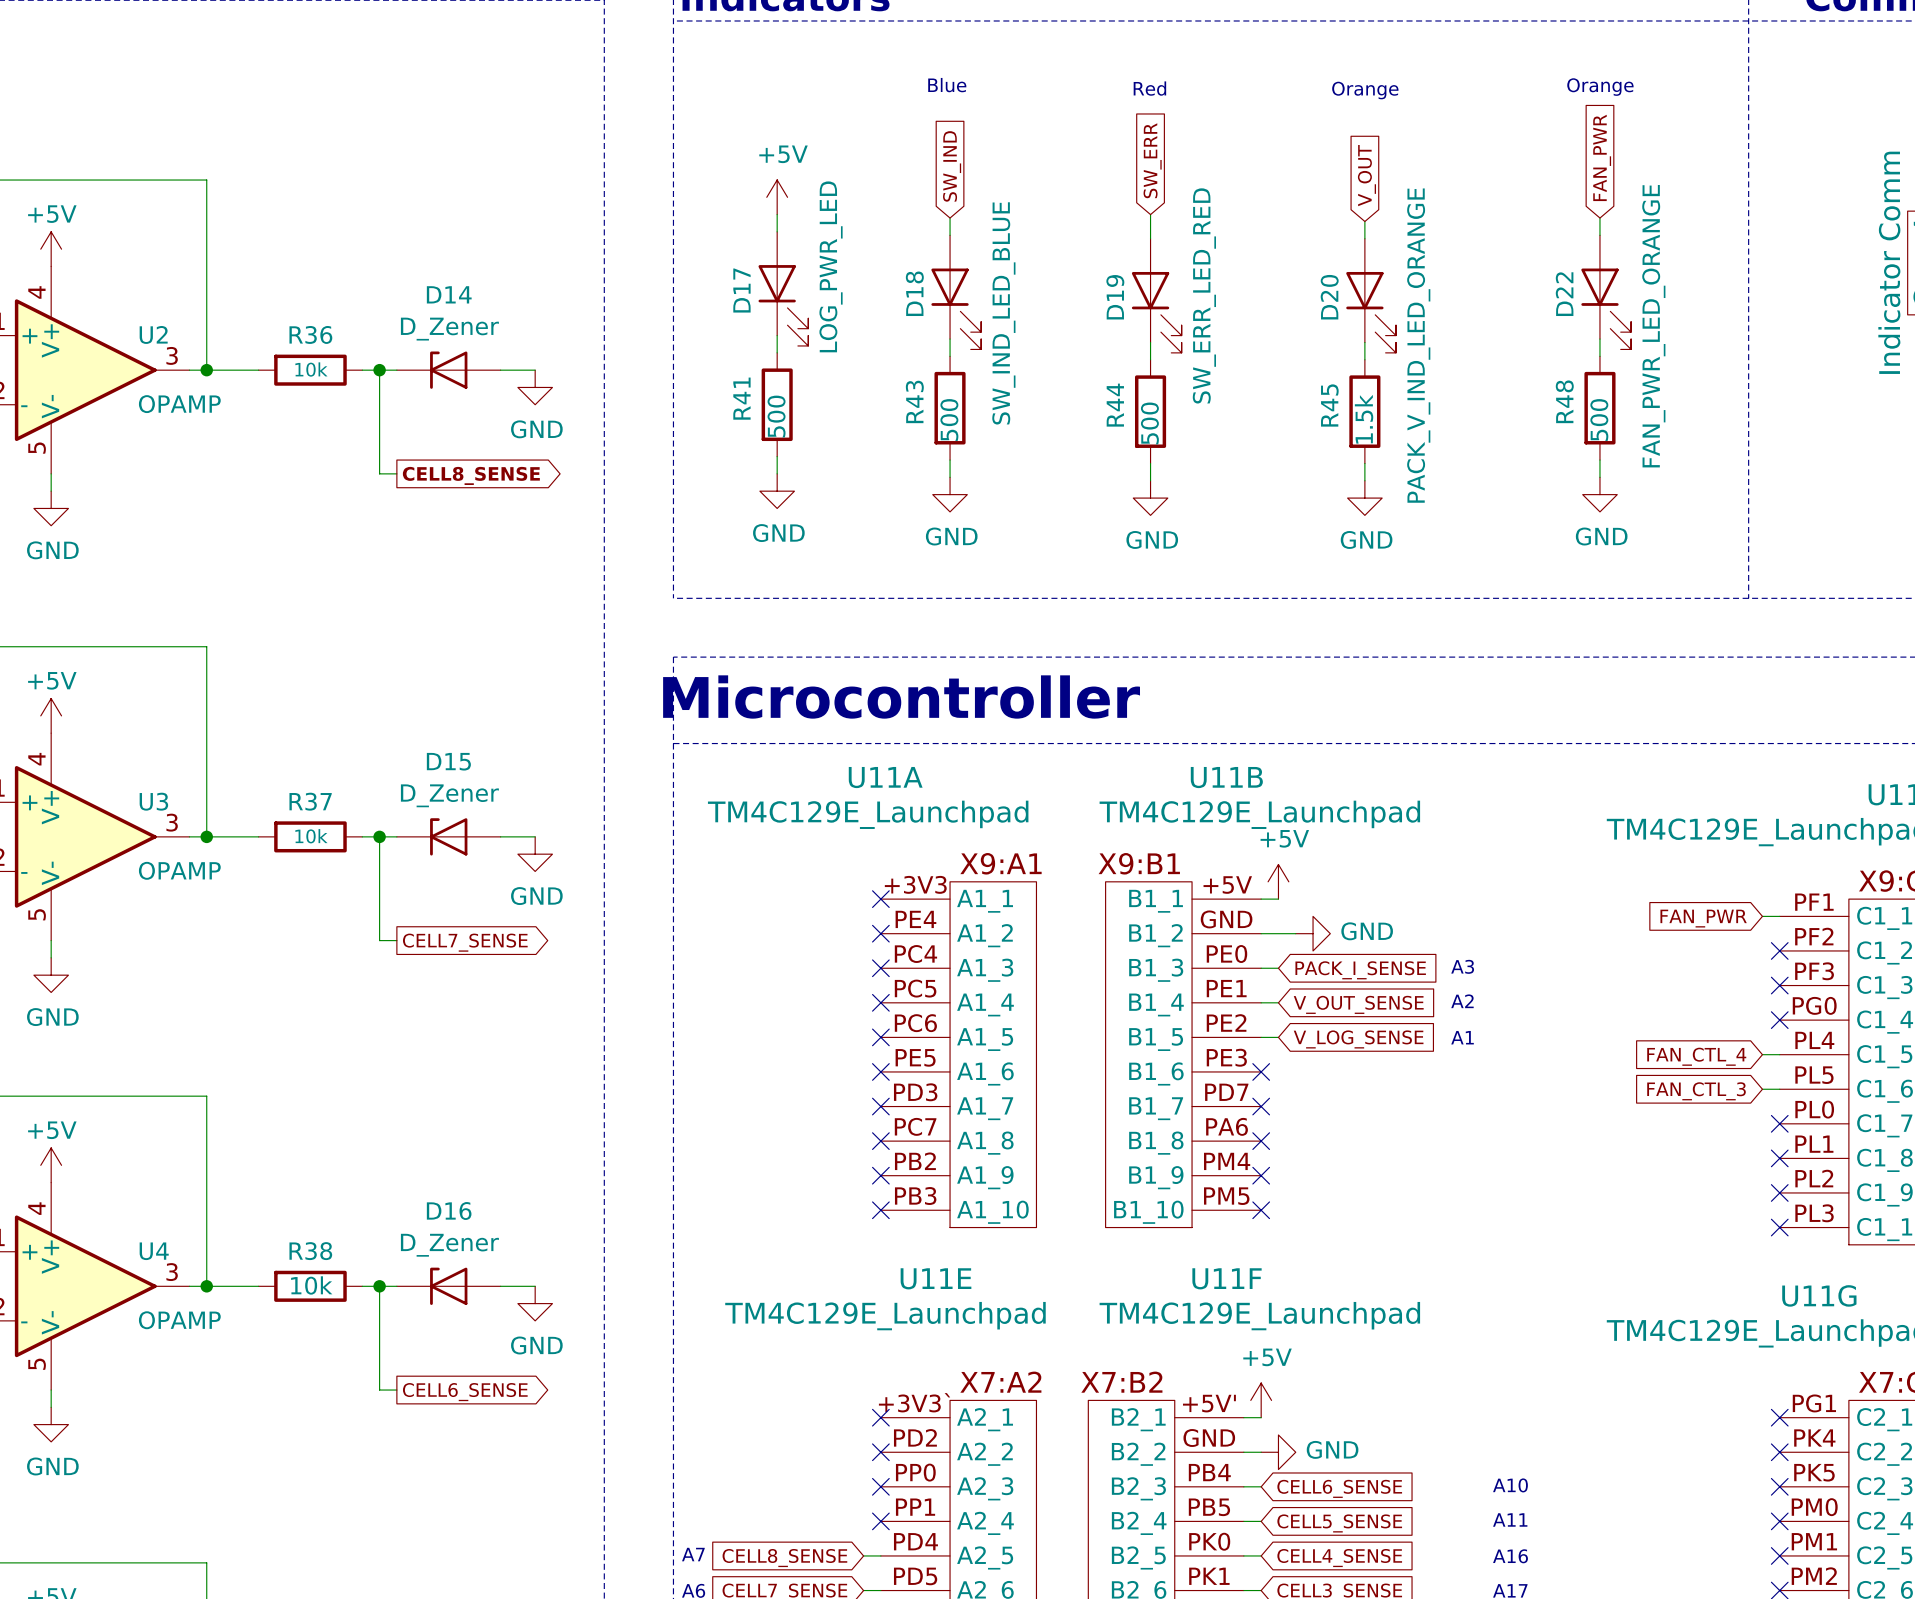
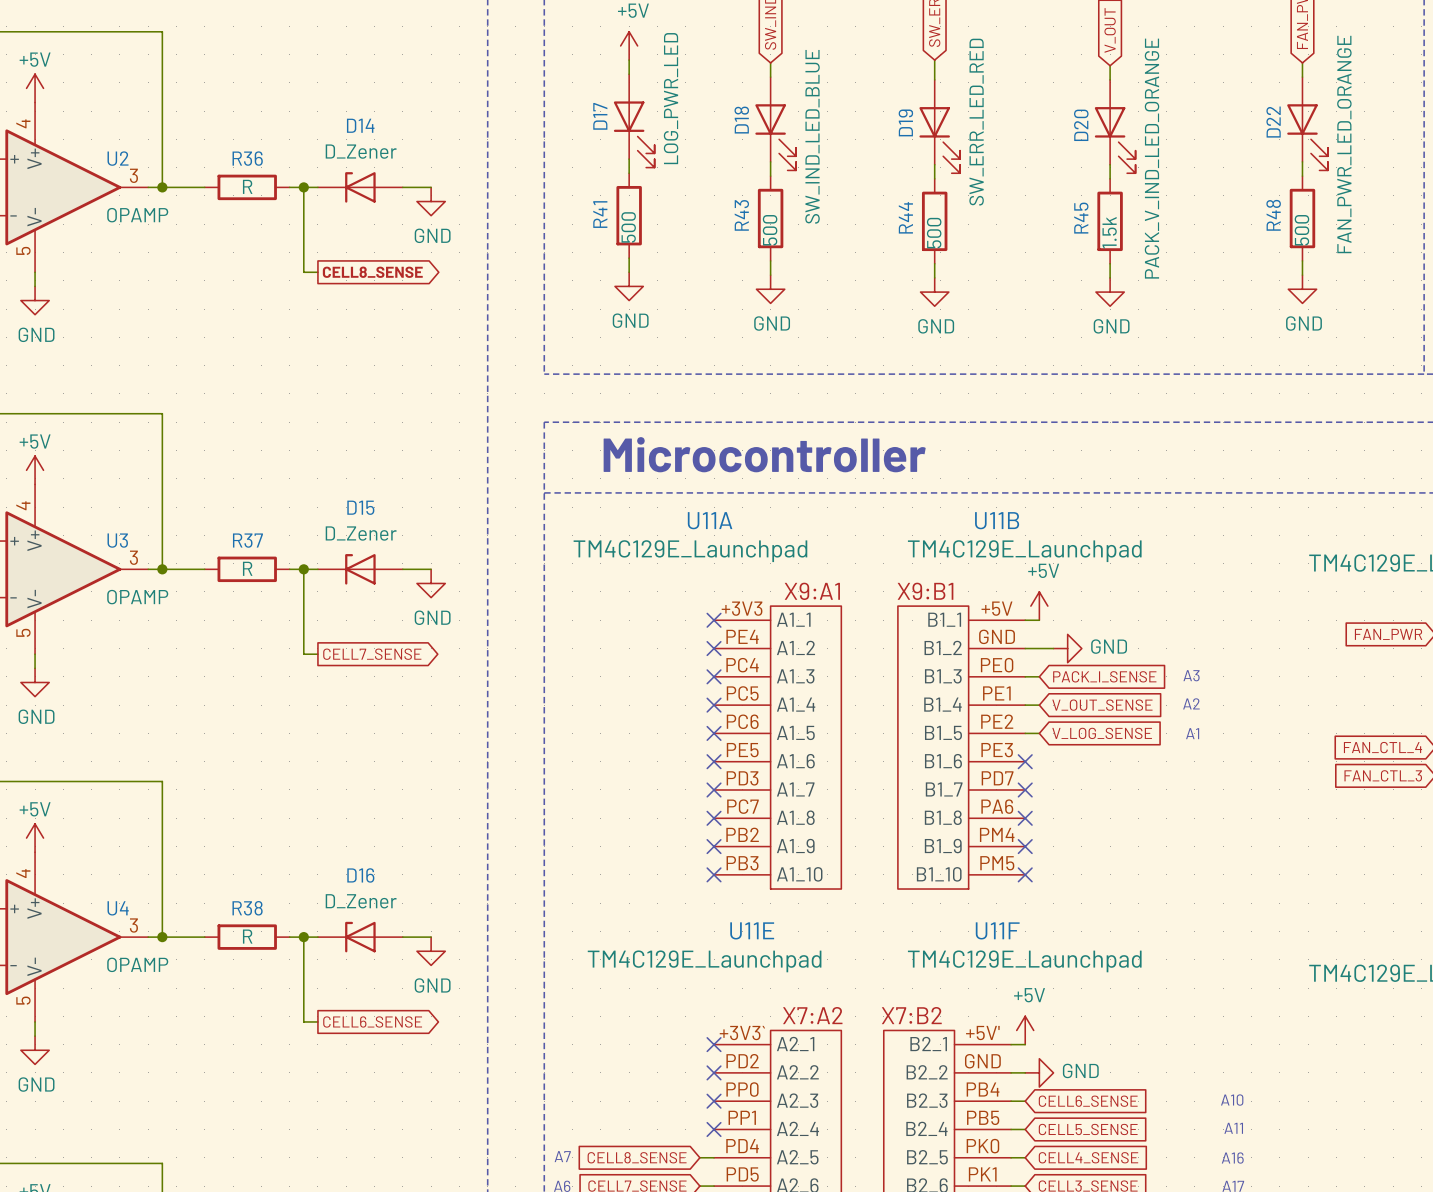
R36 value: 10k (311, 369) -> R (247, 186)
R37 value: 10k (311, 836) -> R (247, 568)
R38 value: 10k (311, 1285) -> R (247, 936)

